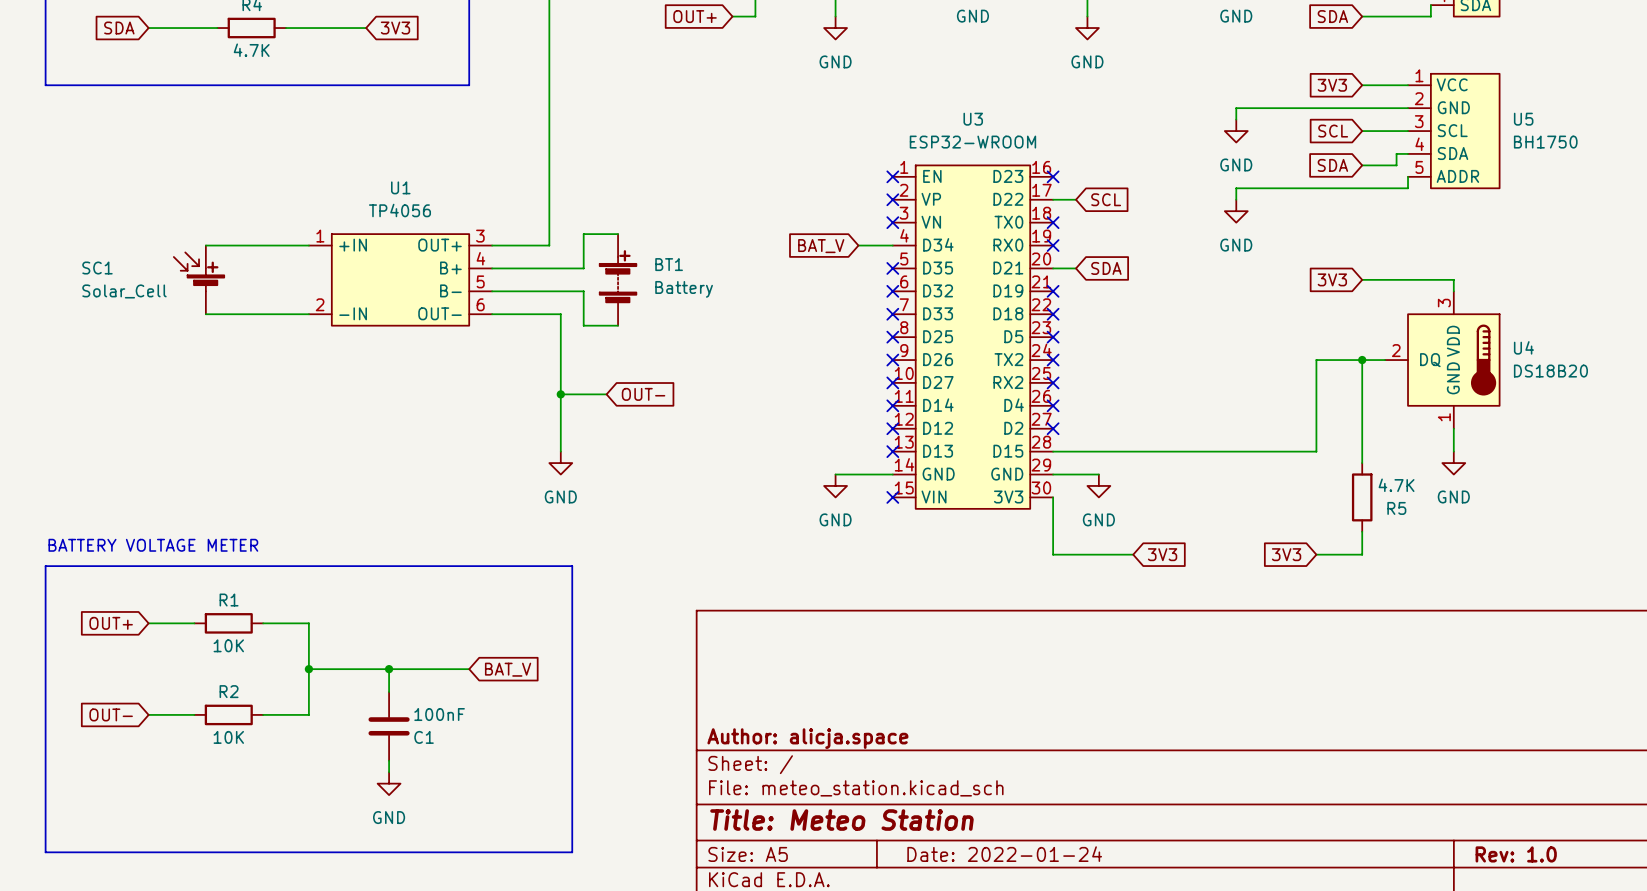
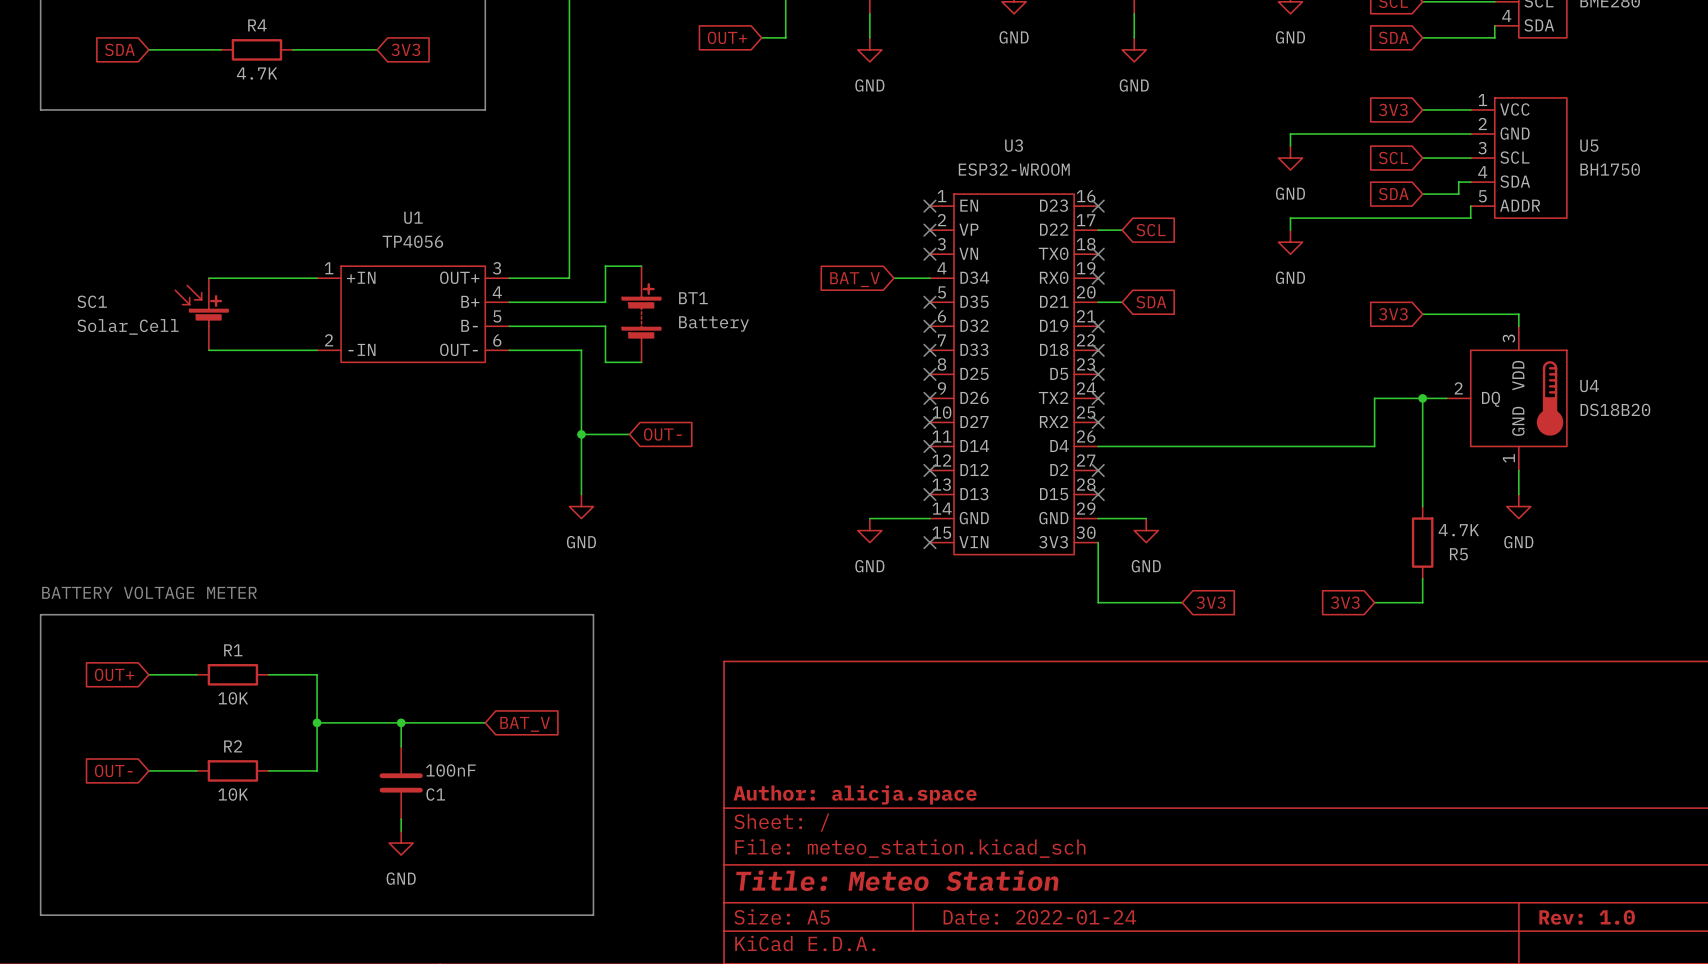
no-connect mark position: (1053, 405) -> (1098, 494)
wire: (1316, 405) (1316, 451) (1053, 451) -> (1374, 446) (1098, 446)

